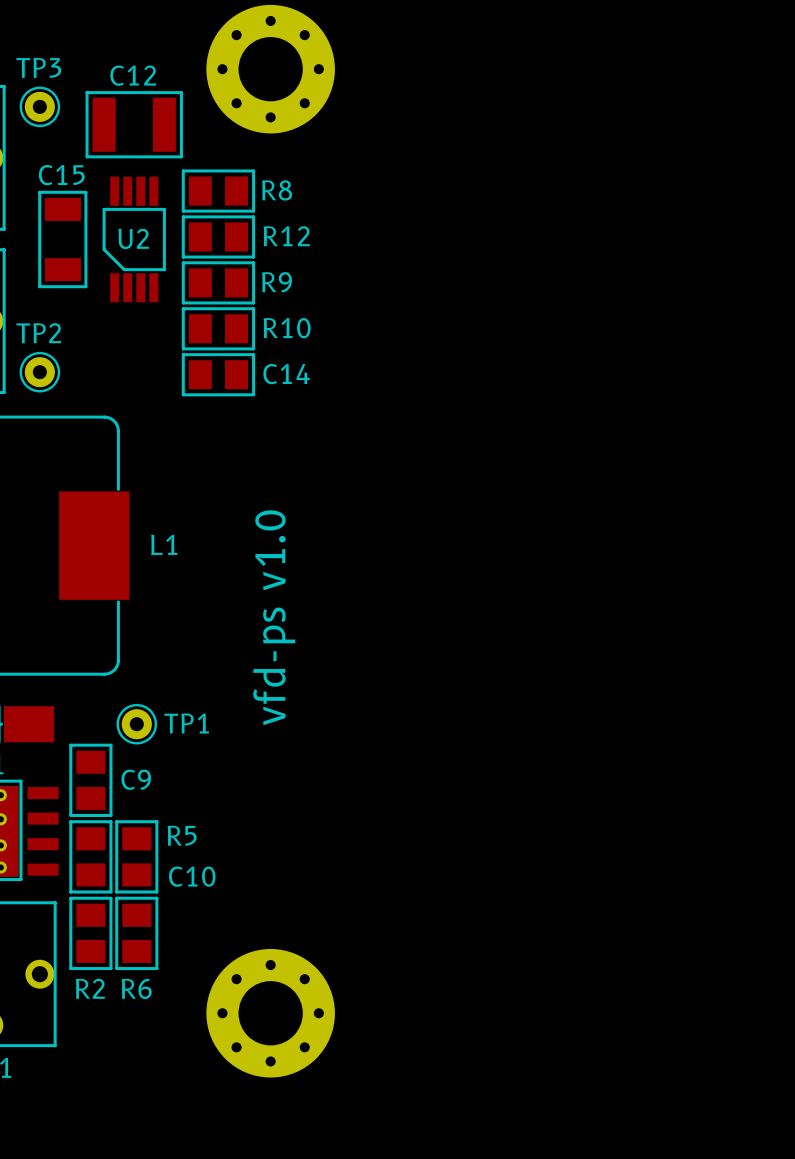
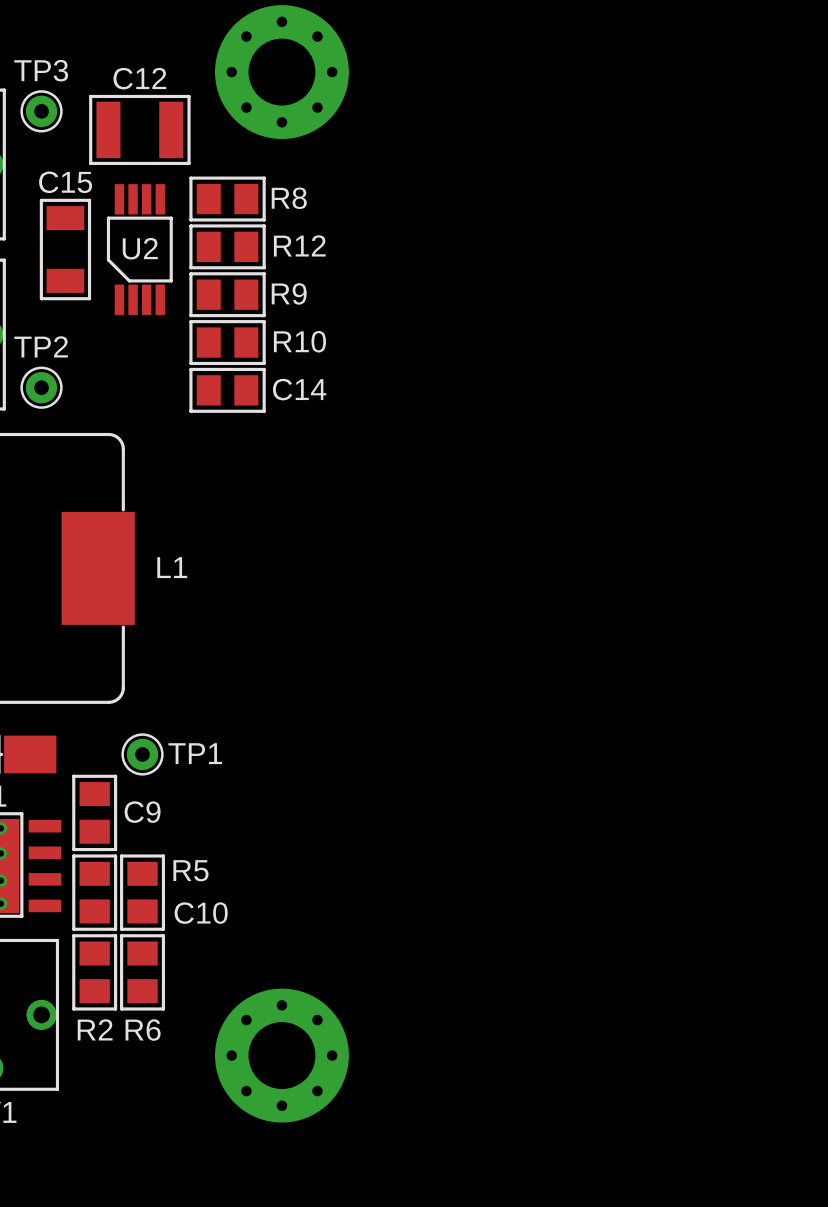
text: vfd-ps v1.0 (274, 617) -> none

